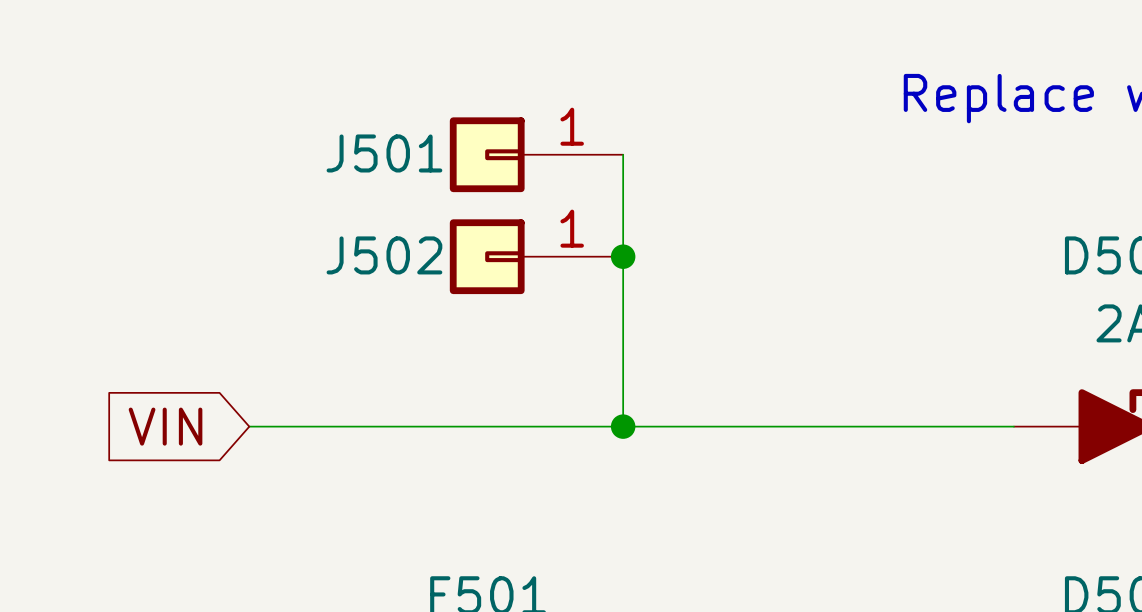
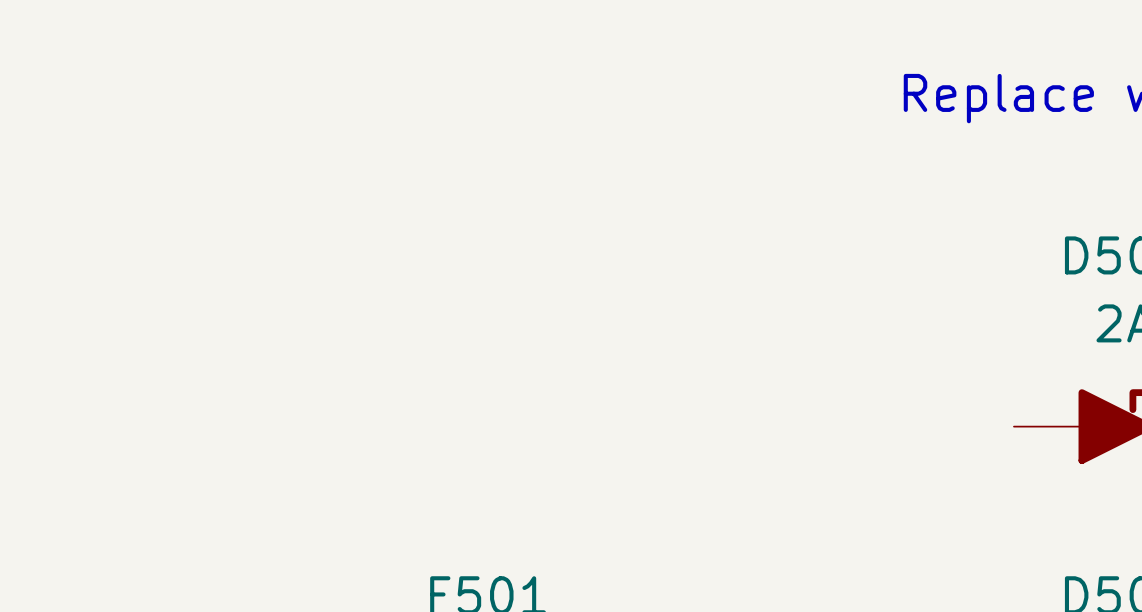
J501: (536, 154) -> none
wire: (623, 154) (623, 426) -> none
J502: (536, 256) -> none
junction: (623, 256) -> none
global label: VIN (165, 426) -> none
wire: (249, 426) (1013, 426) -> none
junction: (623, 426) -> none

